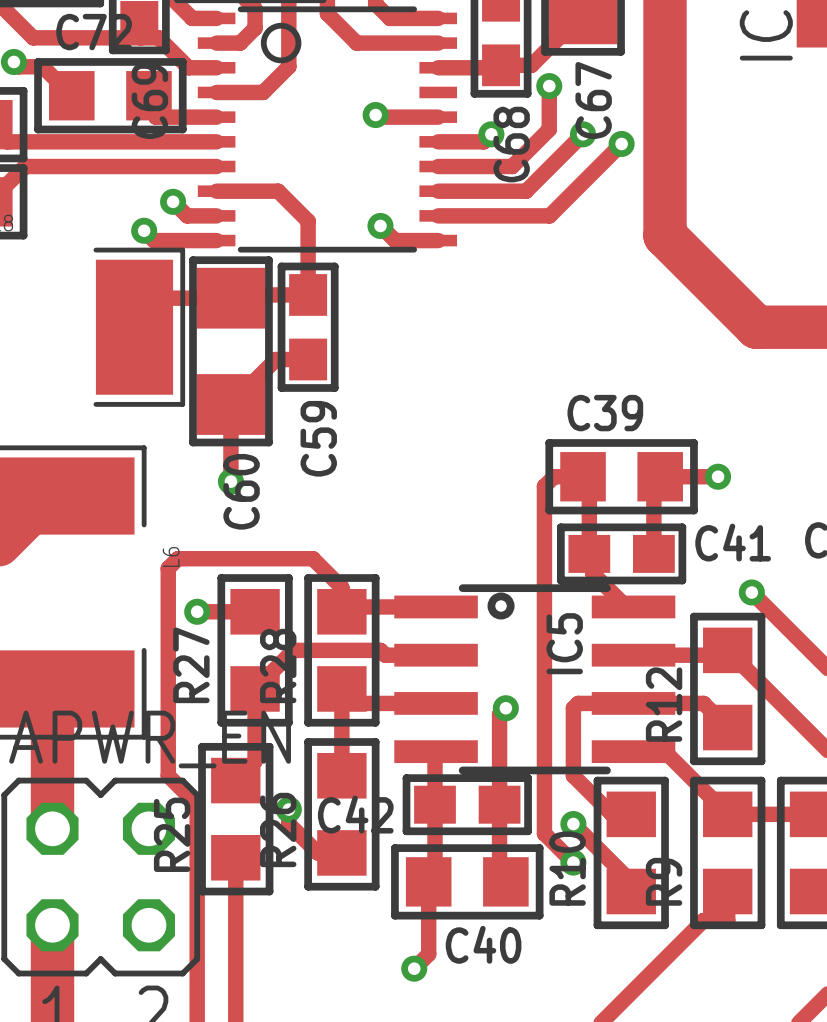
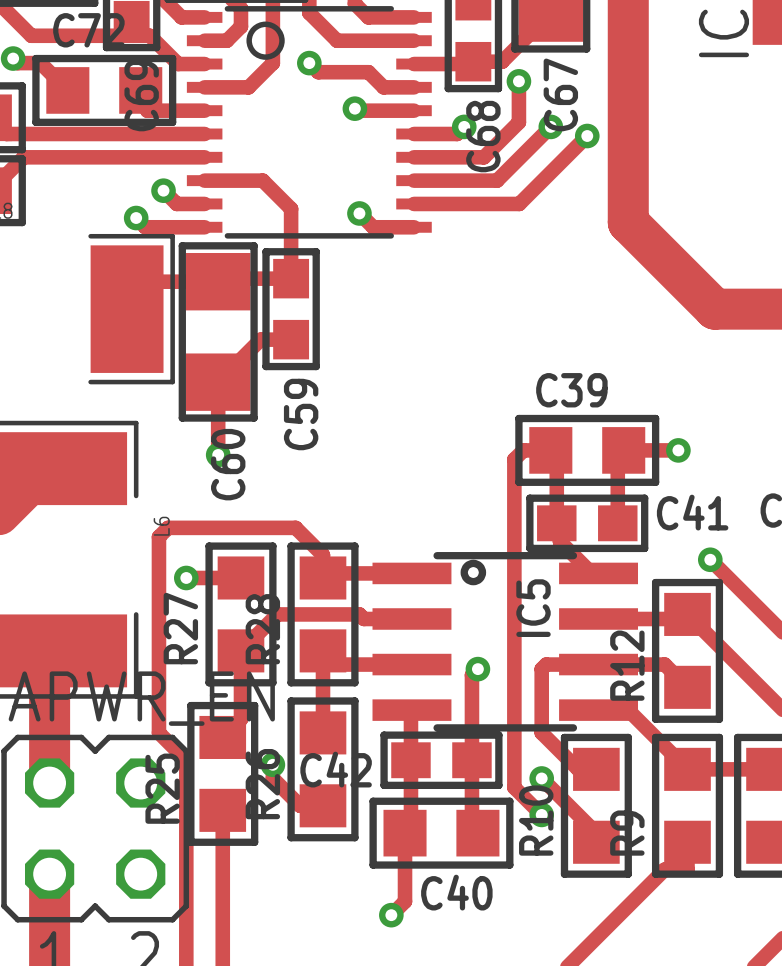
track: none -> (309, 63) (318, 72) (368, 72) (383, 87) (414, 87)
via: none -> (309, 63)

